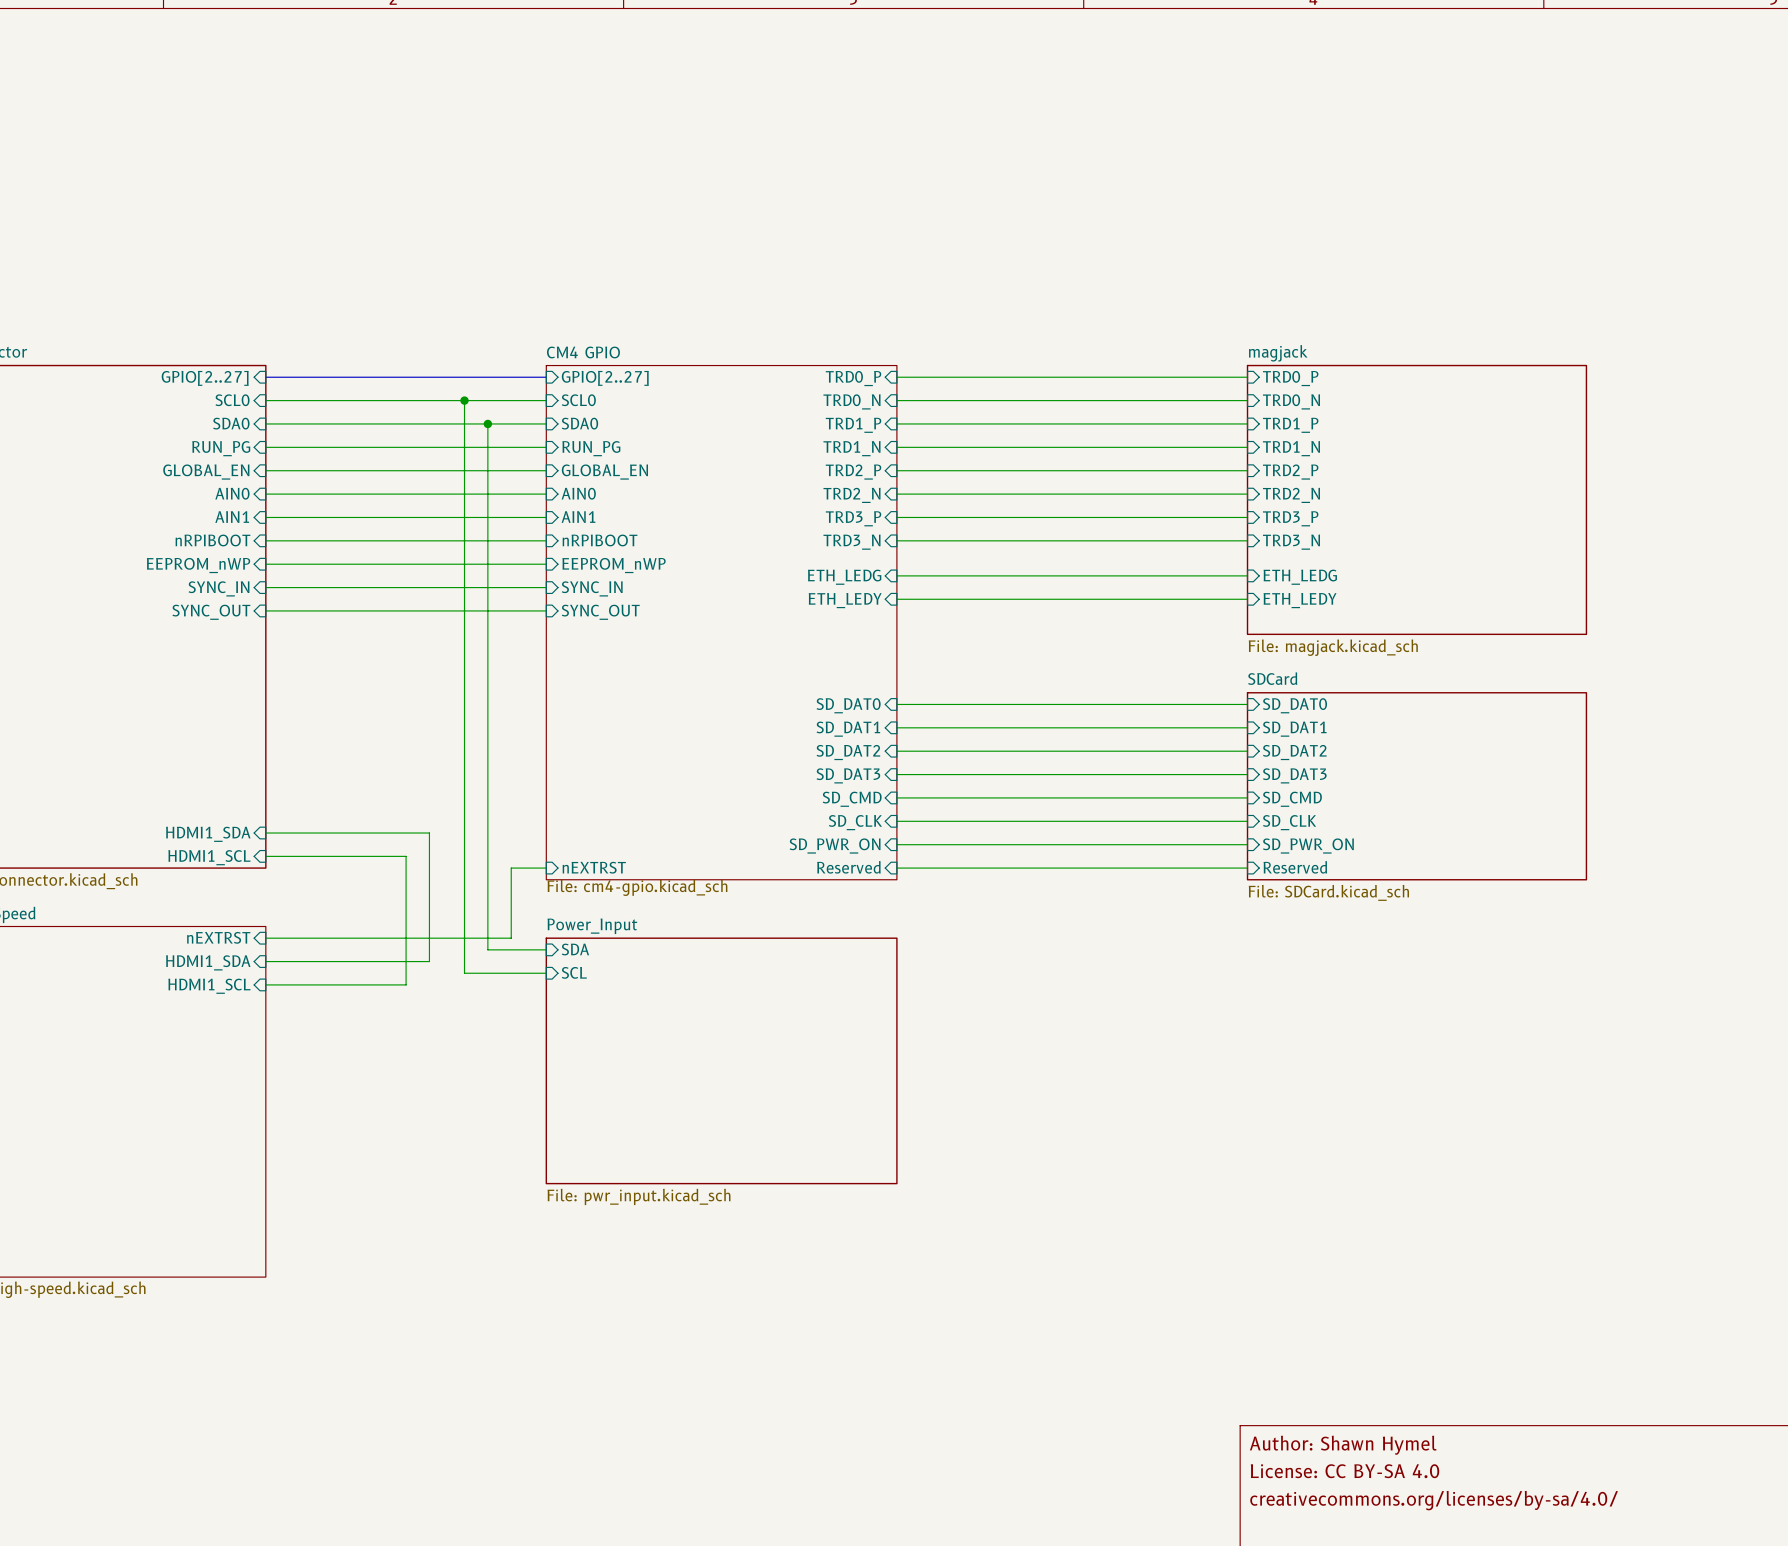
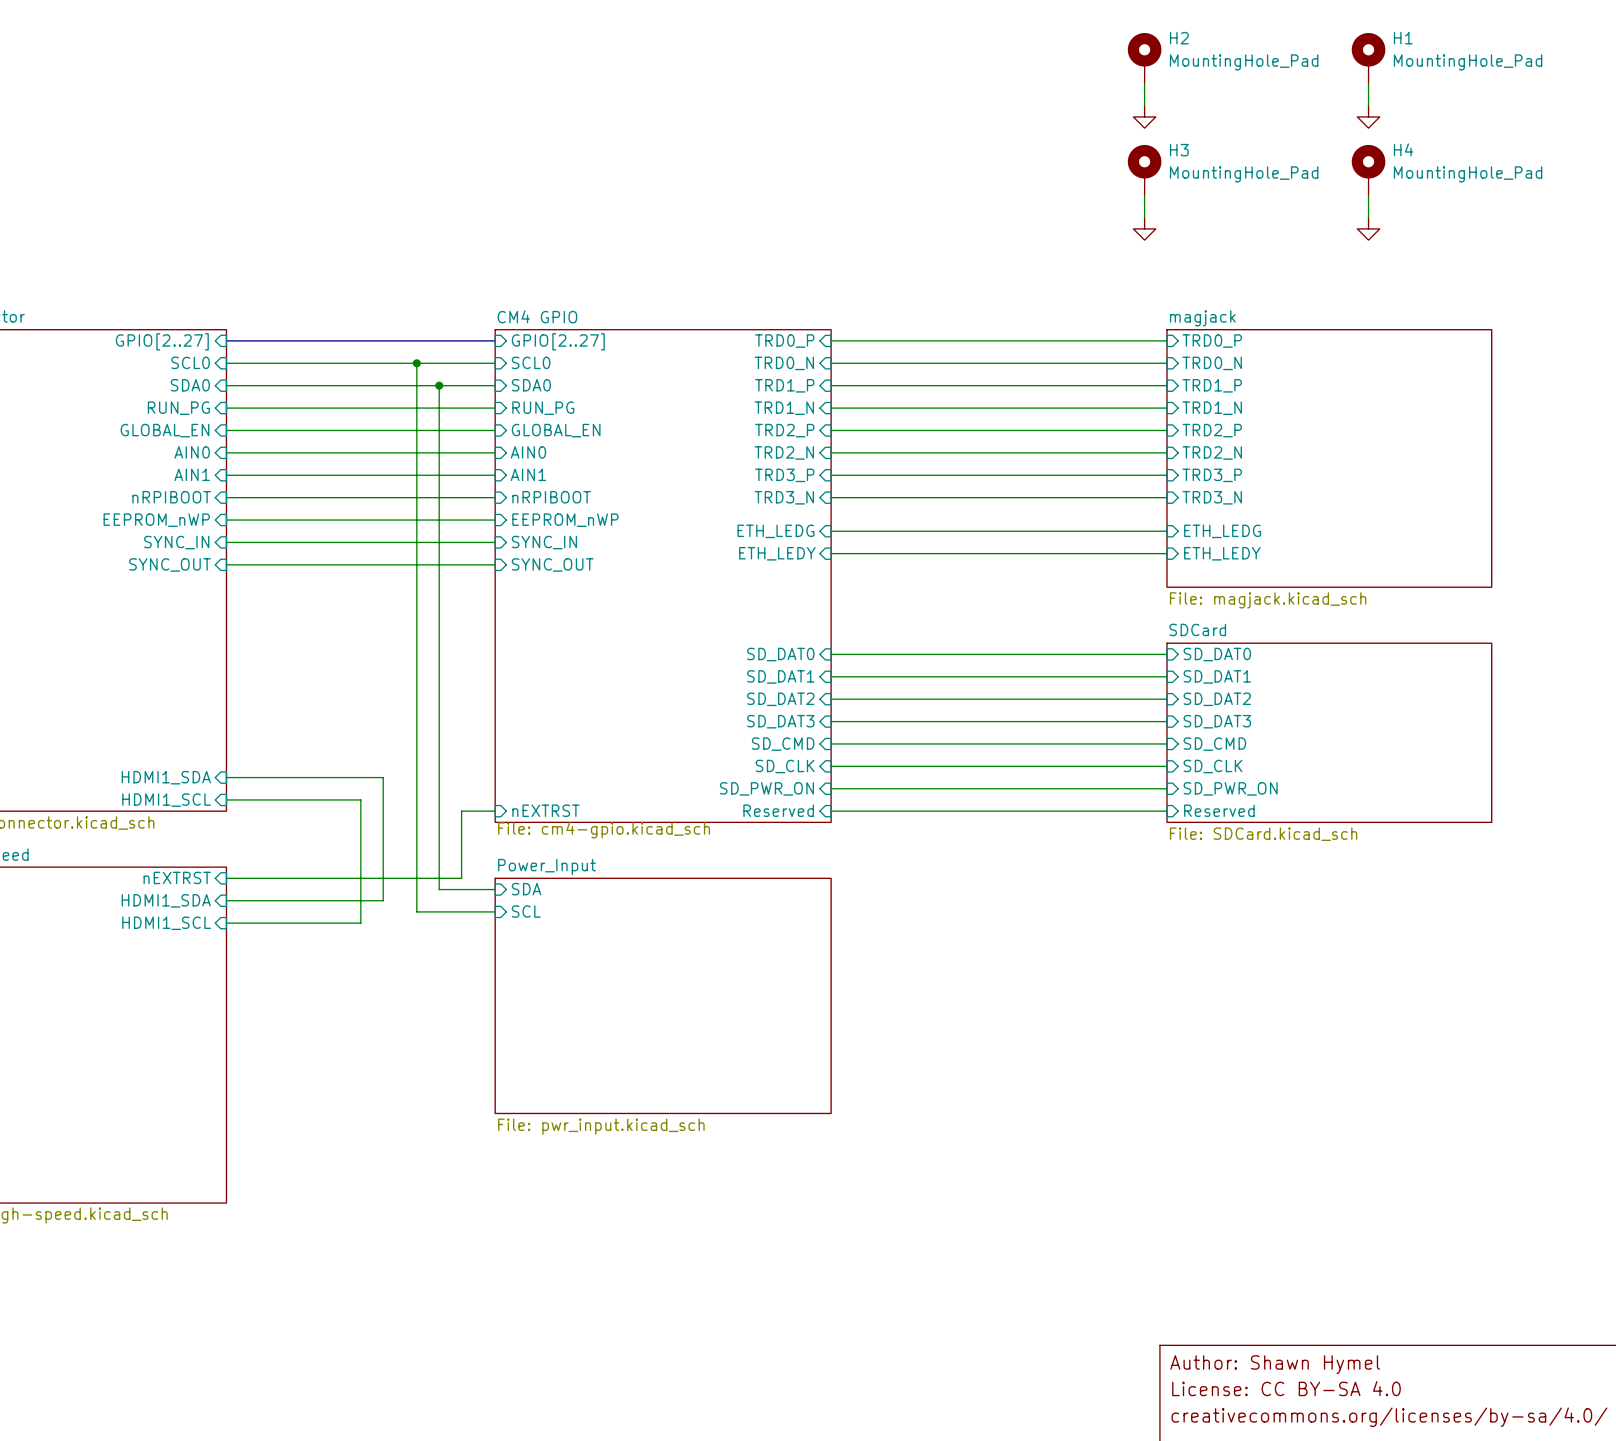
H2: none -> MountingHole_Pad (1144, 58)
H1: none -> MountingHole_Pad (1368, 58)
wire: none -> (1144, 83) (1144, 105)
wire: none -> (1368, 83) (1368, 105)
power symbol: none -> (1144, 116)
power symbol: none -> (1368, 116)
H3: none -> MountingHole_Pad (1144, 170)
H4: none -> MountingHole_Pad (1368, 170)
wire: none -> (1144, 195) (1144, 217)
wire: none -> (1368, 195) (1368, 217)
power symbol: none -> (1144, 228)
power symbol: none -> (1368, 228)

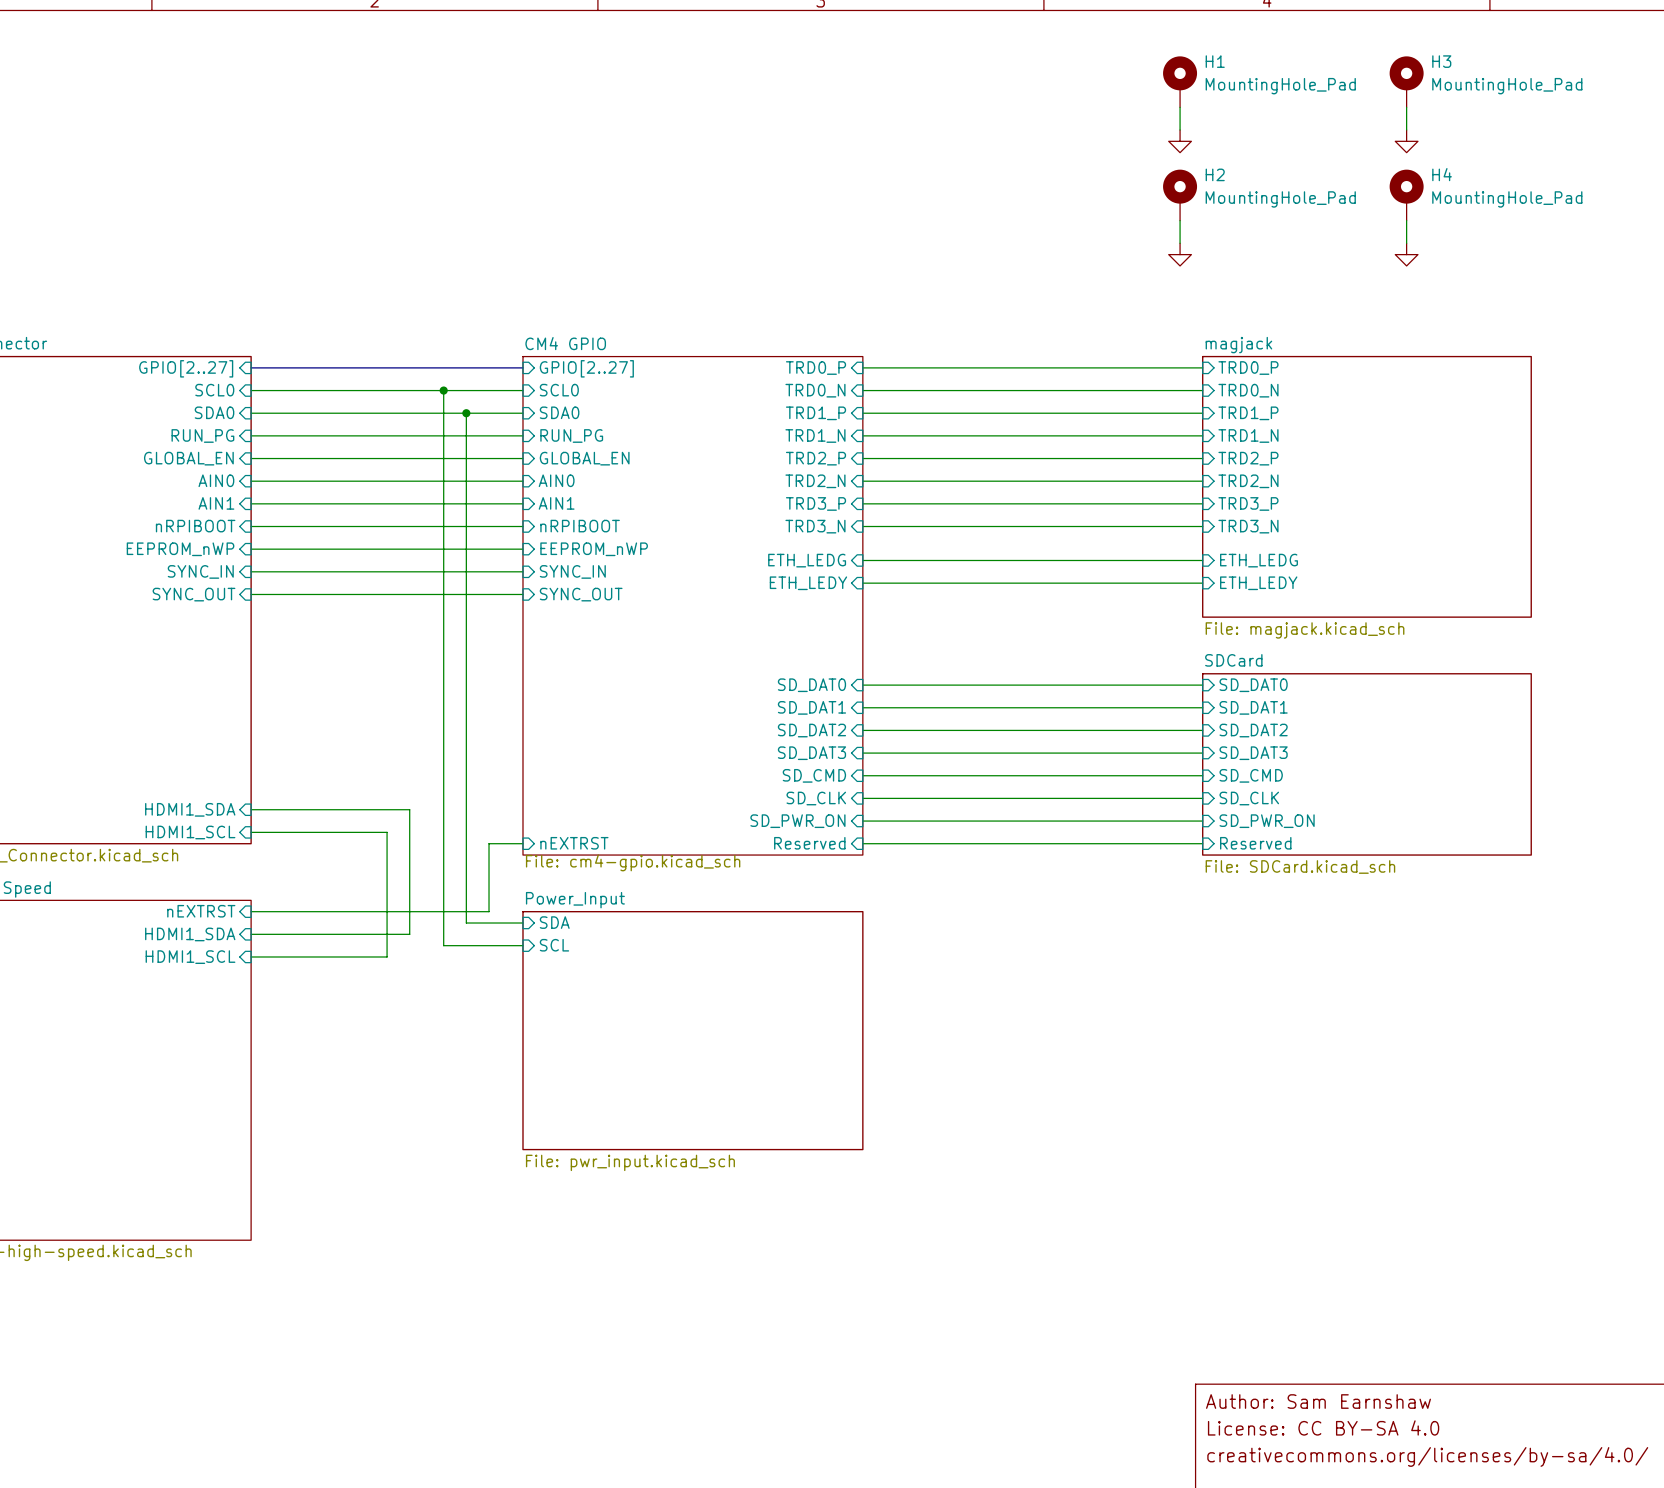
H2 name: H2 (1179, 38) -> H1 (1215, 61)
H1 name: H1 (1403, 38) -> H3 (1441, 61)
H3 name: H3 (1179, 150) -> H2 (1215, 174)
title block: Author: Shawn Hymel (1275, 1364) -> Author: Sam Earnshaw (1318, 1401)

